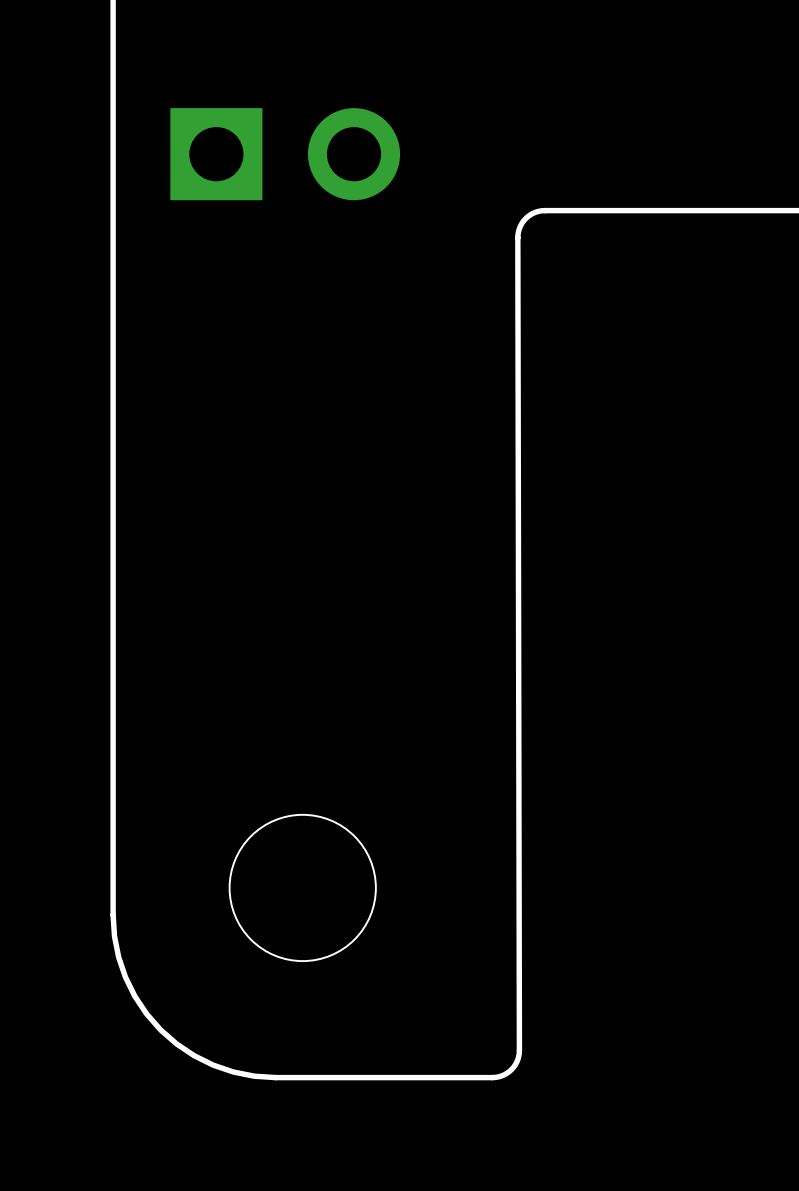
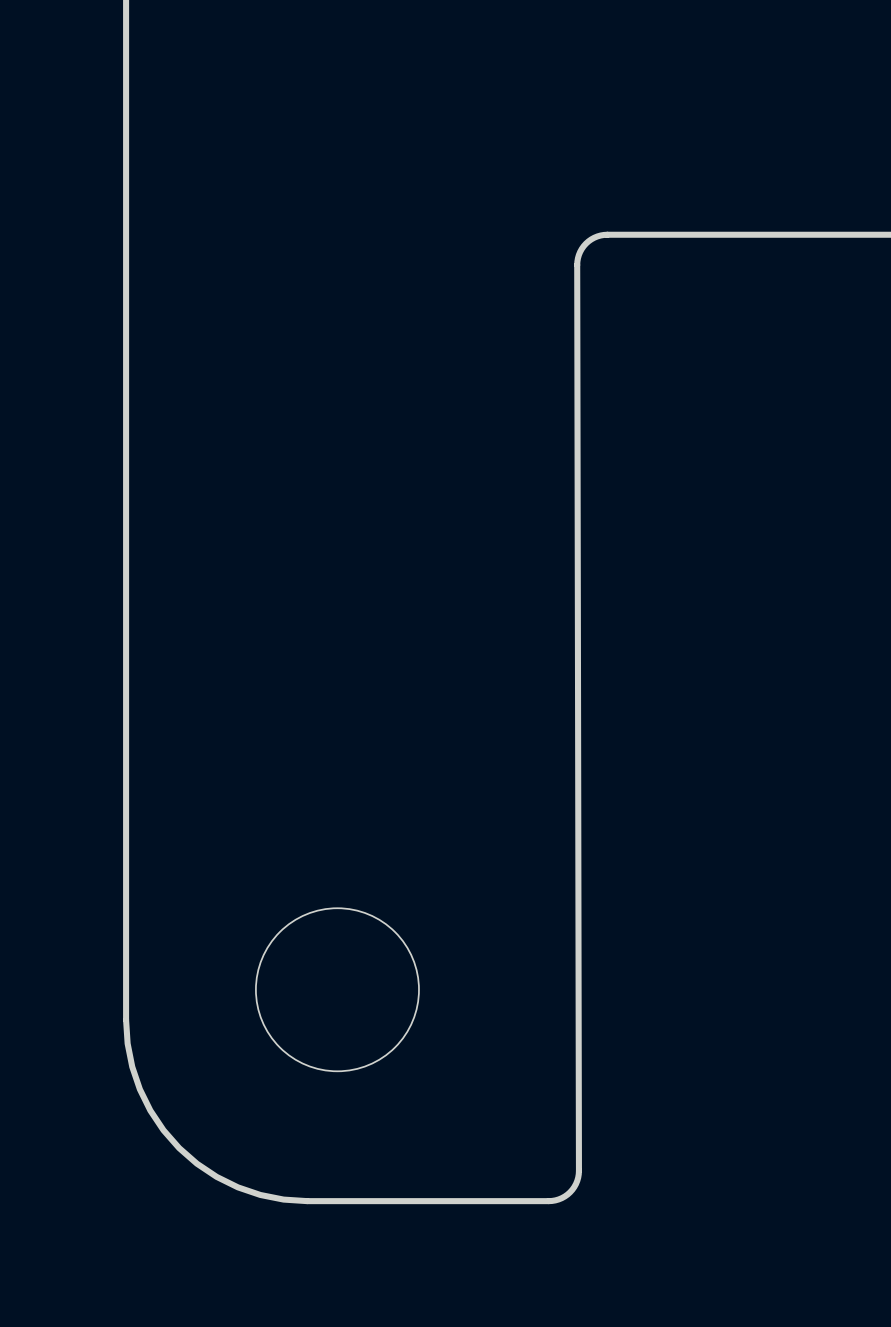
part: (285, 154) -> none

